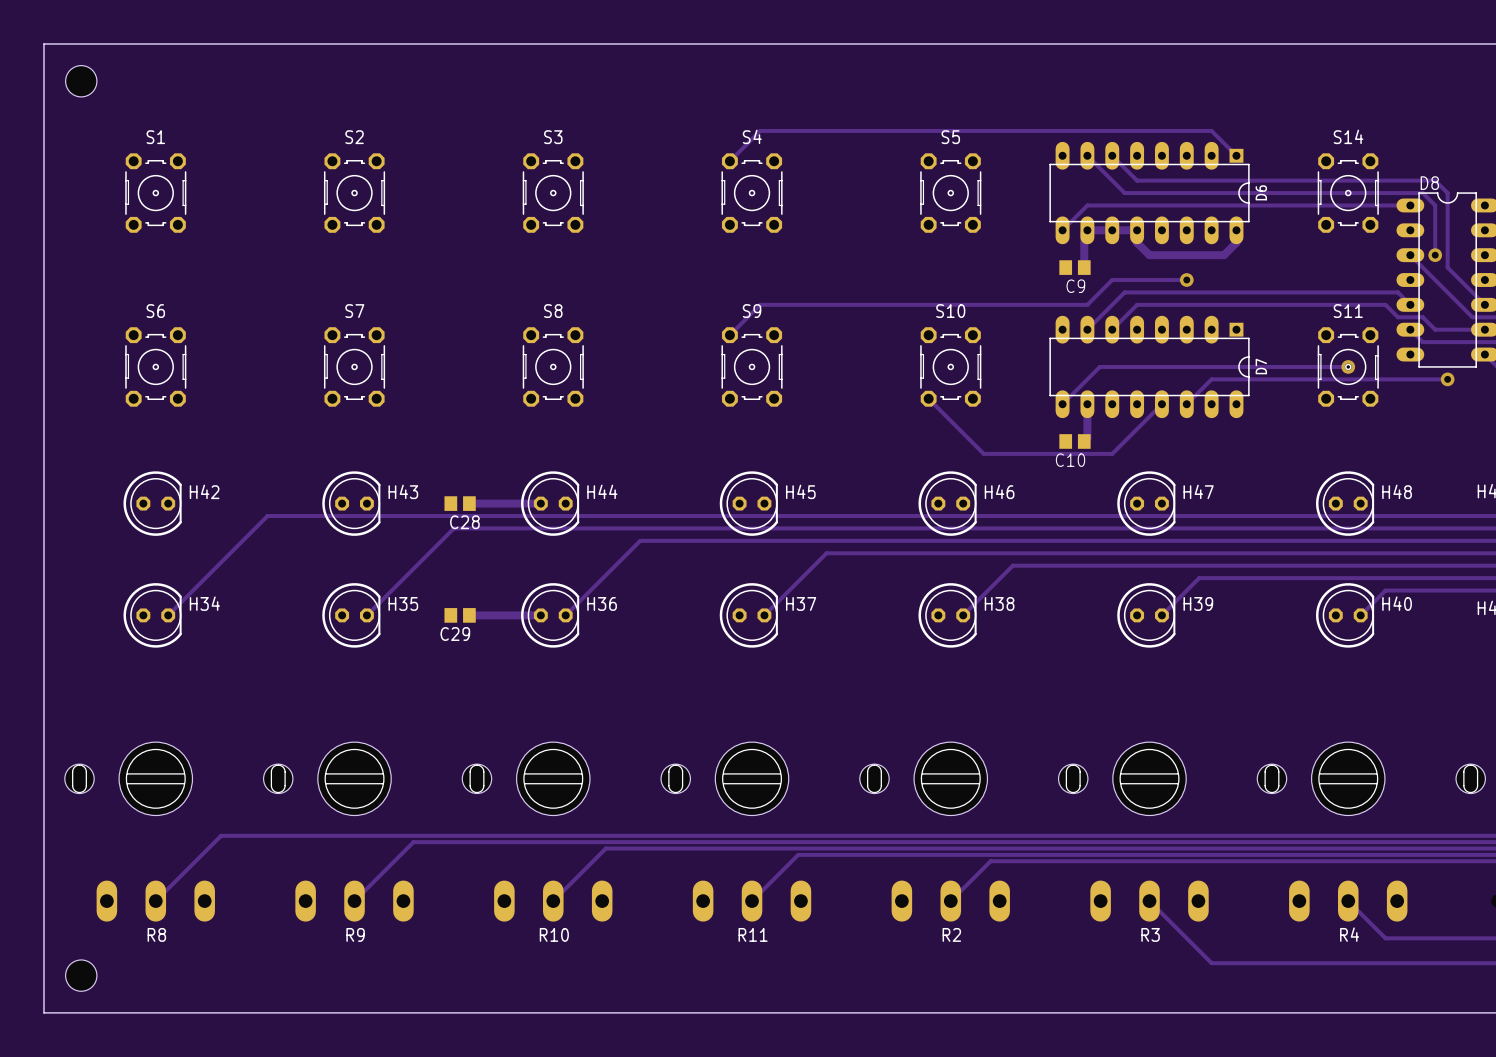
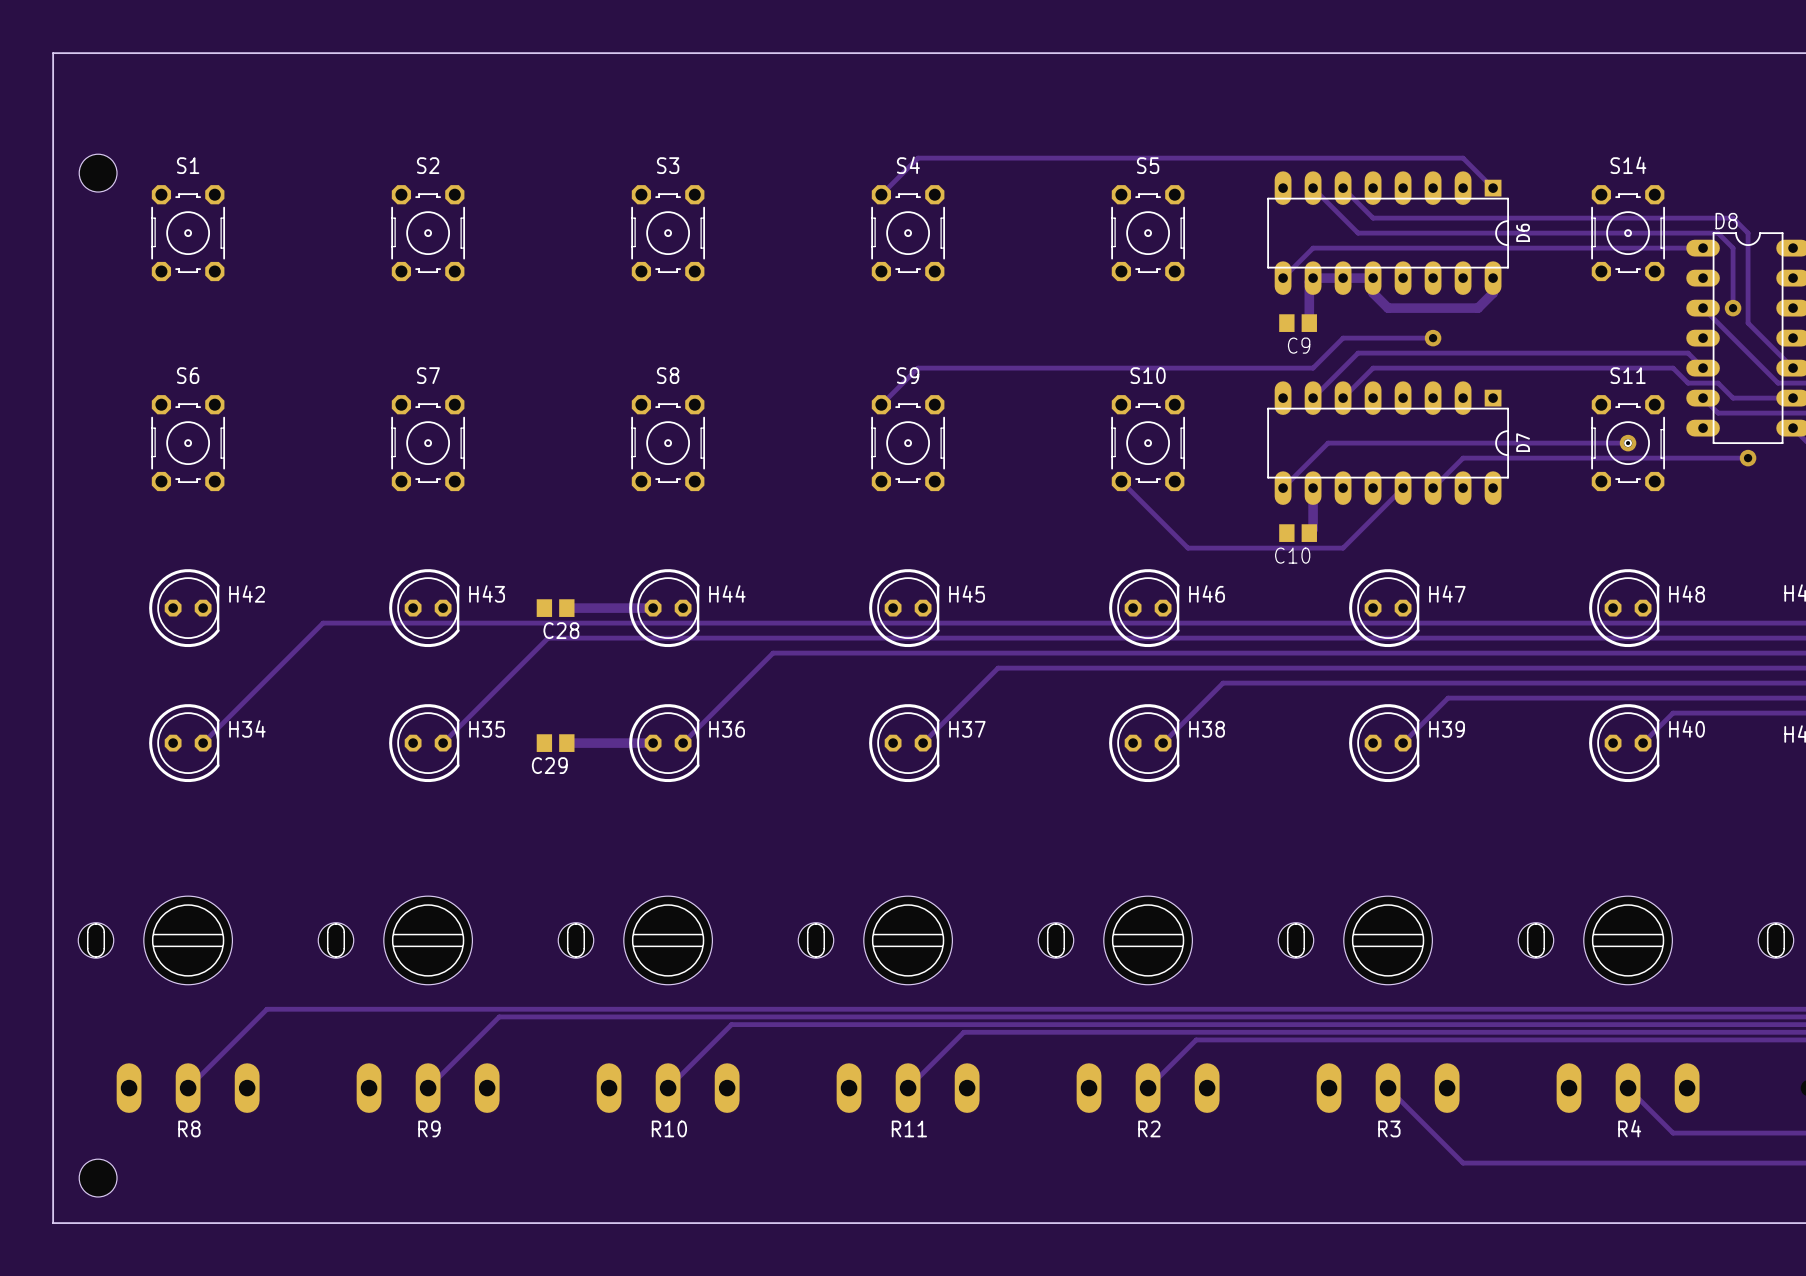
hole position: (81, 81) -> (98, 173)

